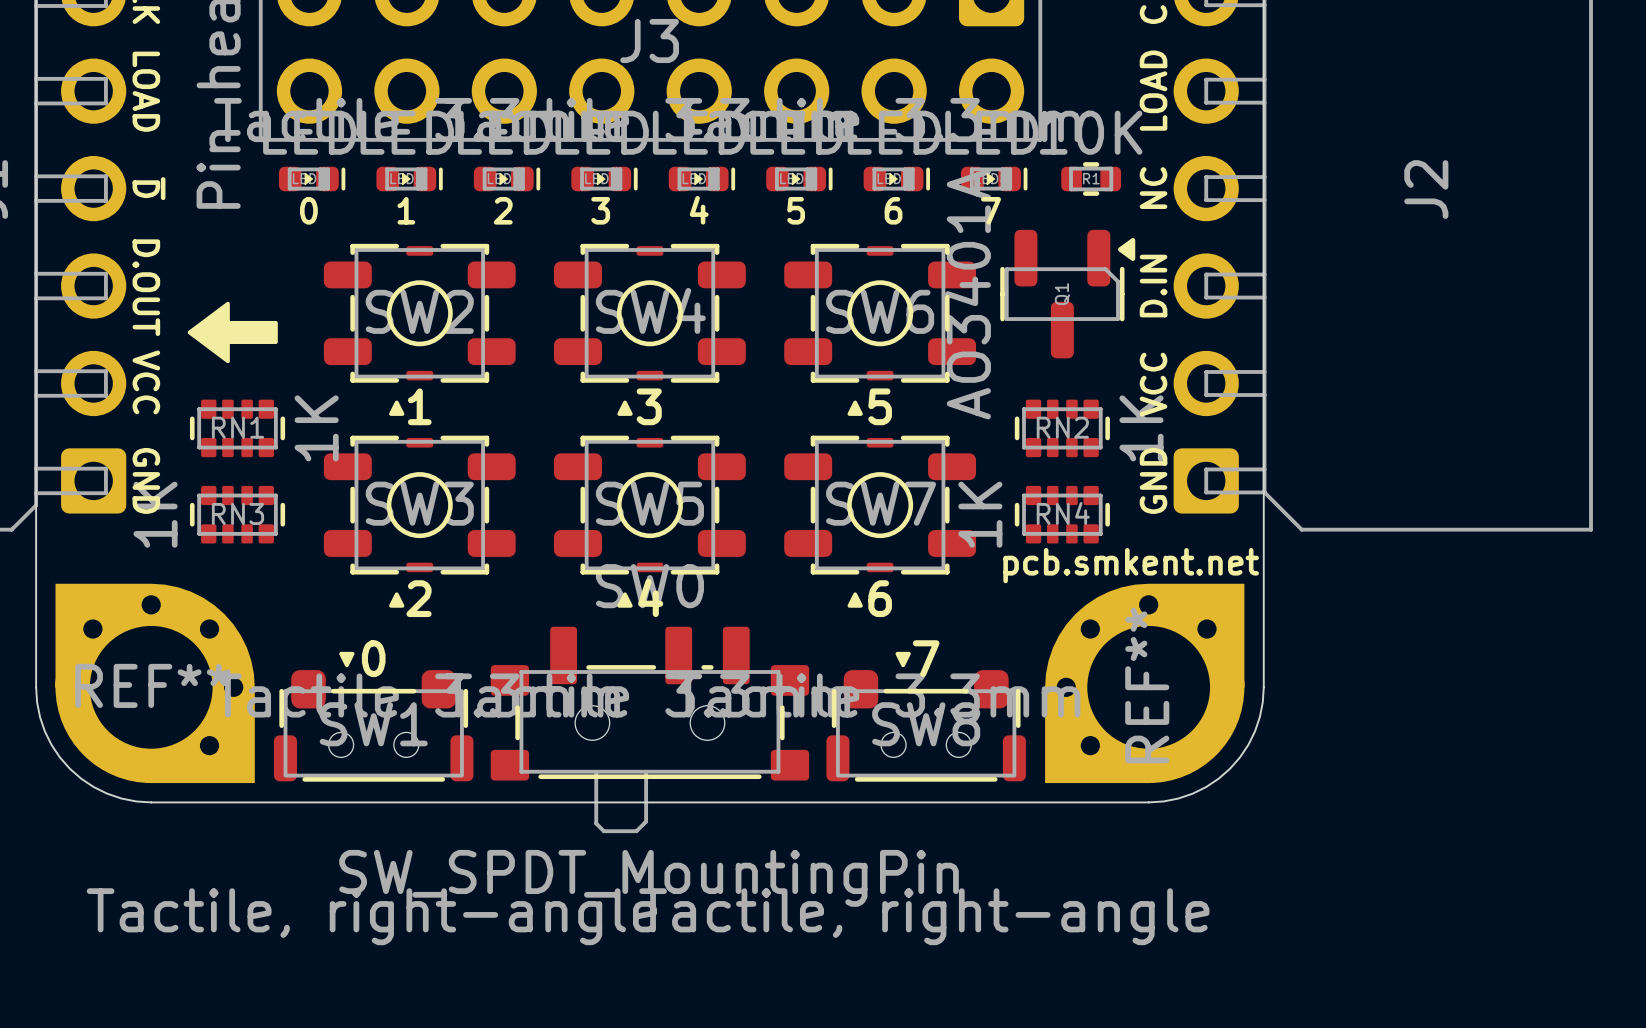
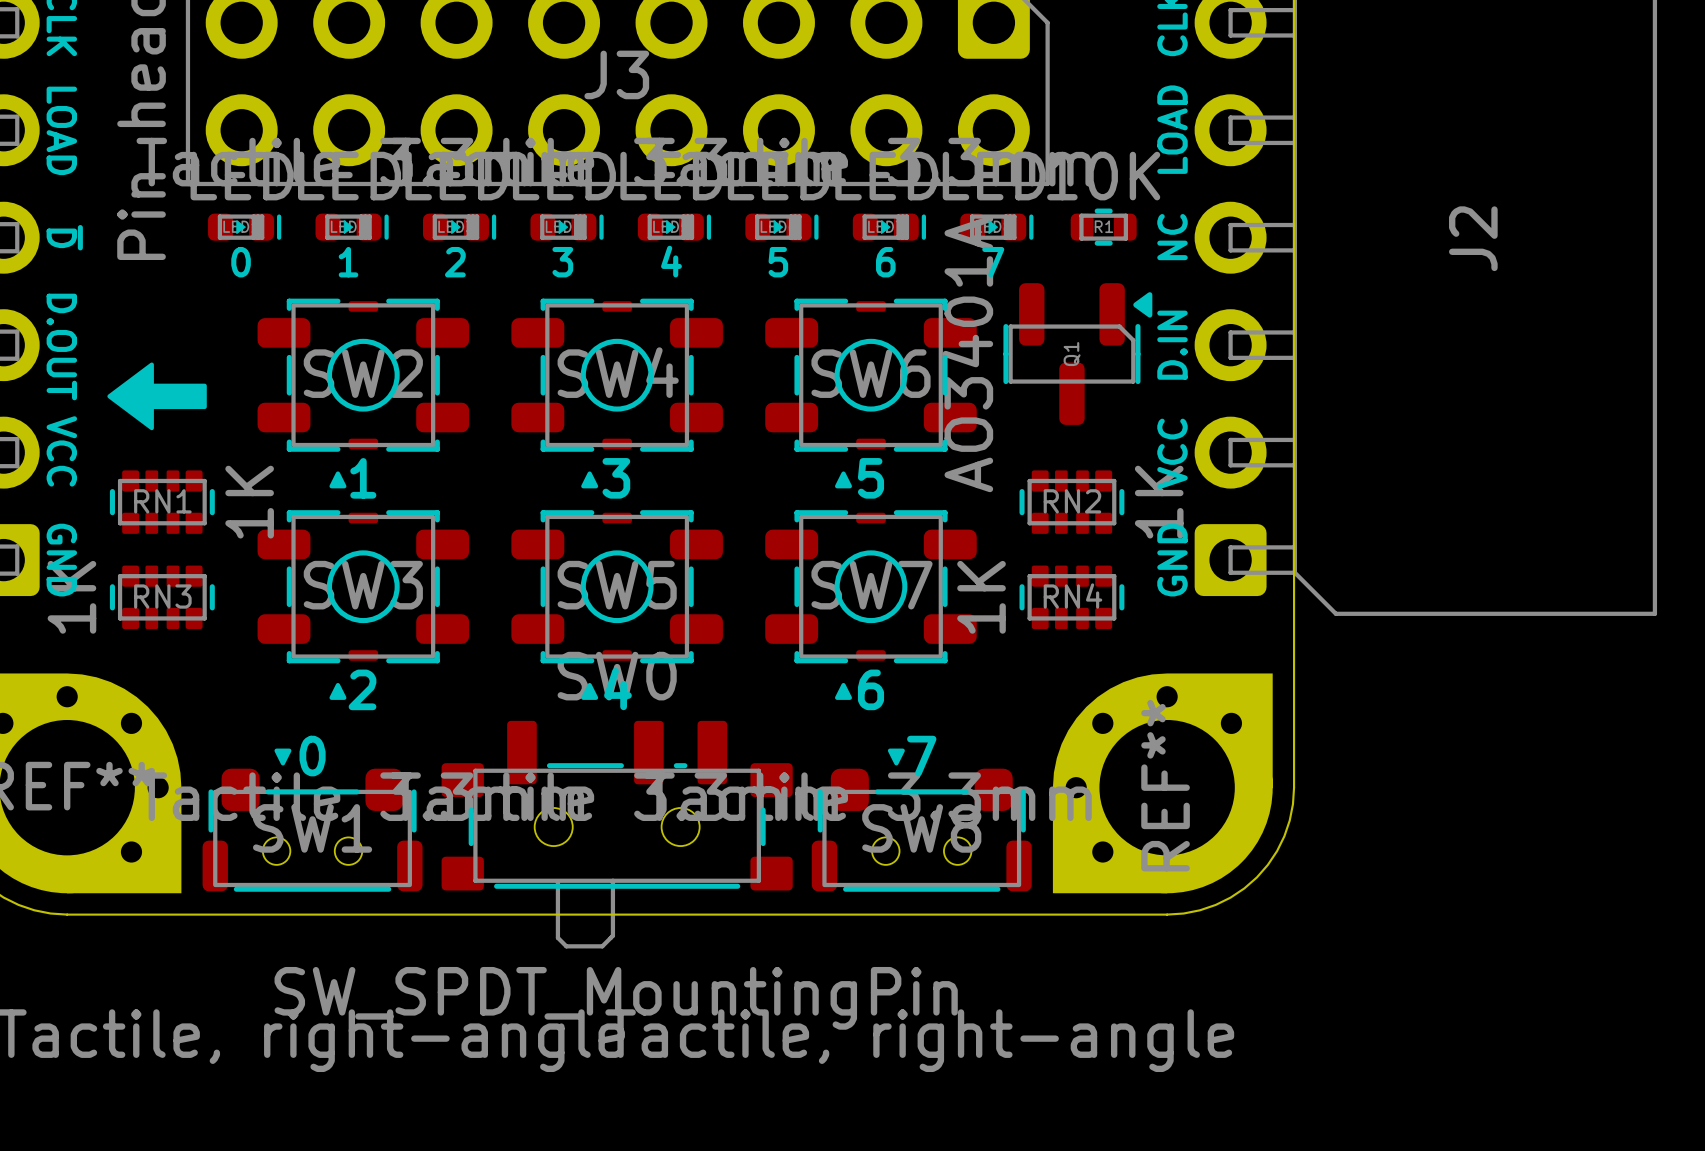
text: pcb.smkent.net (1131, 565) -> none

